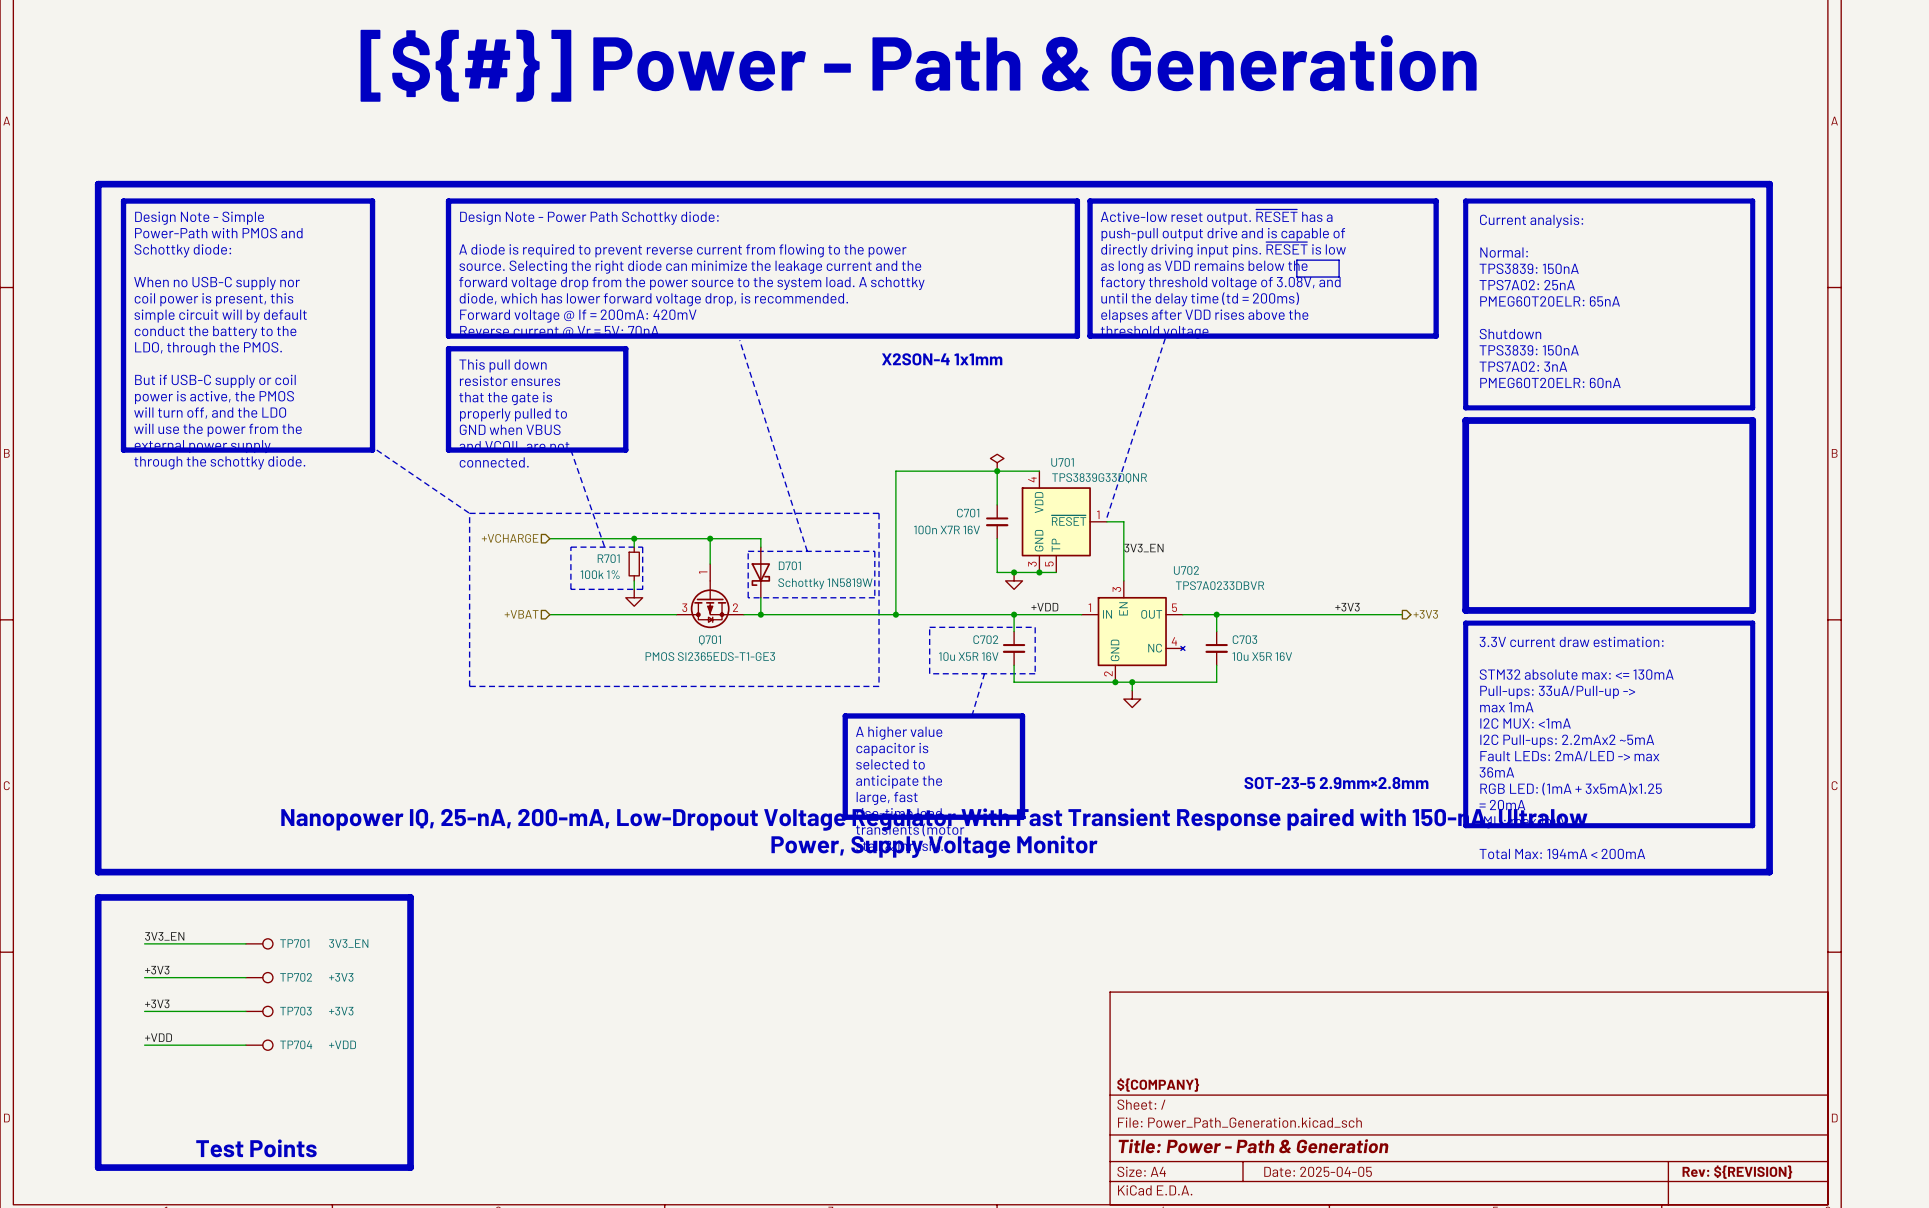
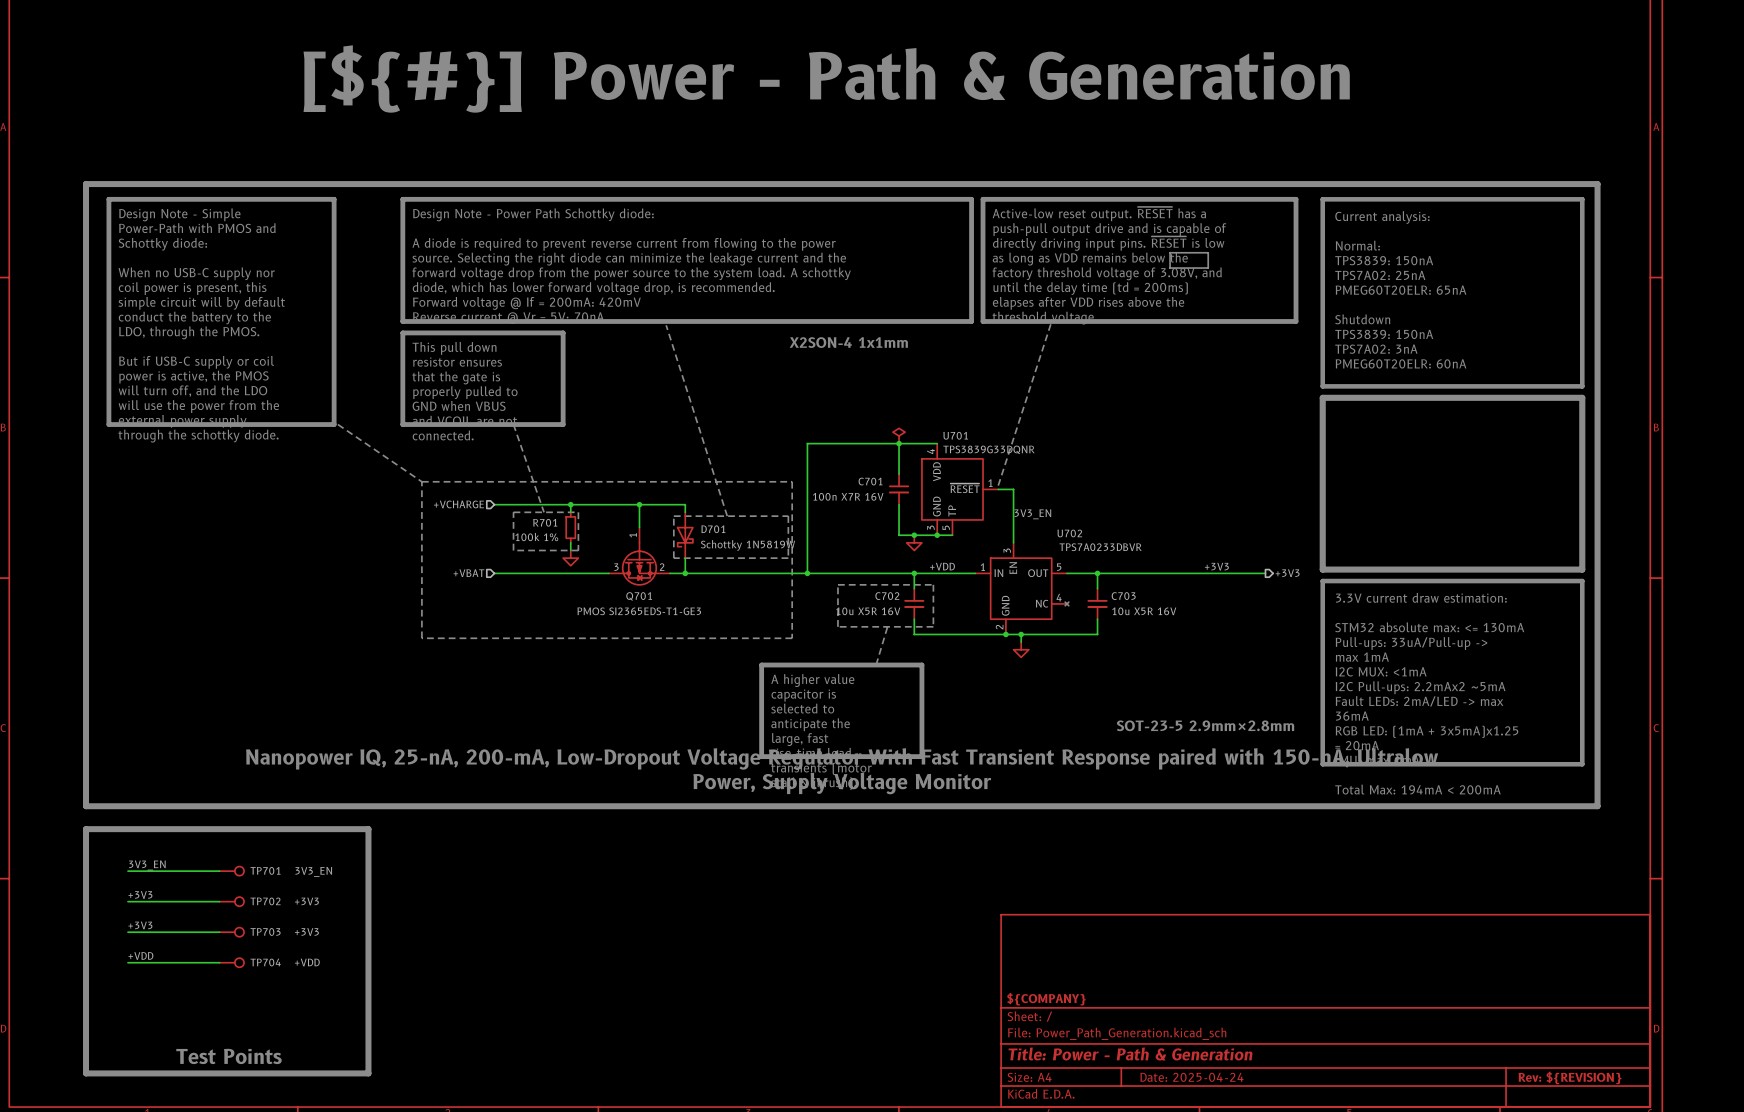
title block: Date: 2025-04-05 (1318, 1171) -> Date: 2025-04-24 (1191, 1077)

